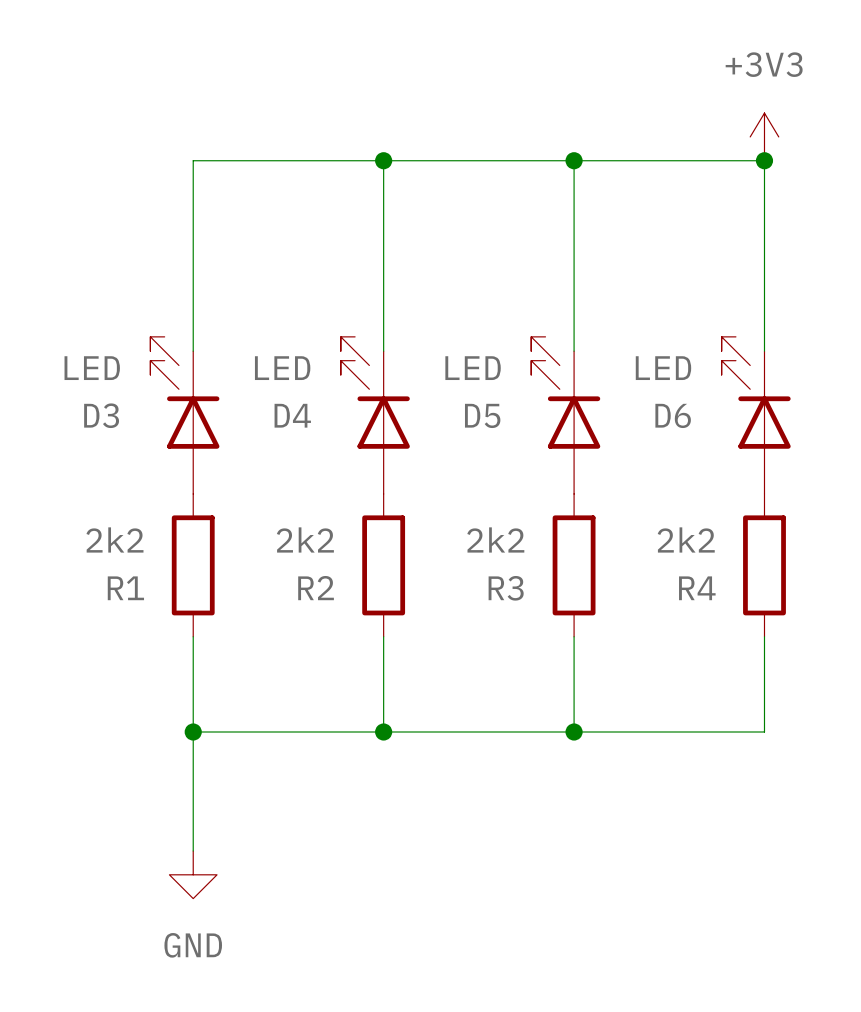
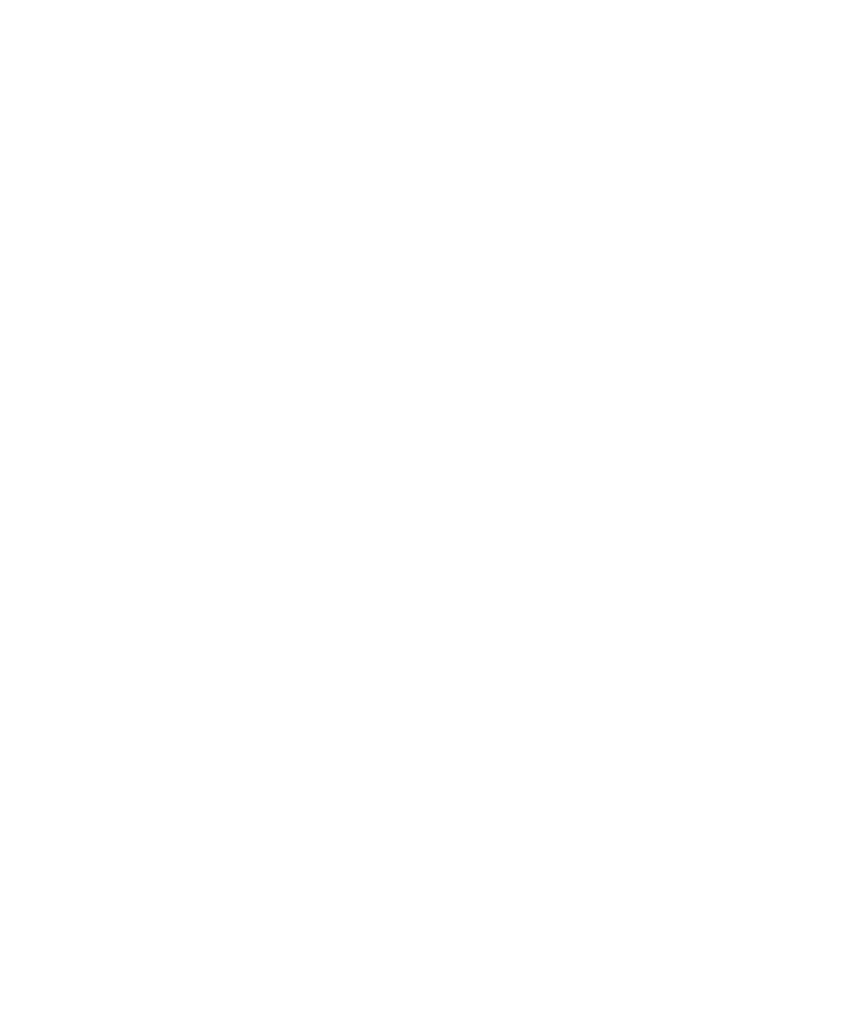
power symbol: +3V3 (764, 136) -> none
wire: (383, 160) (383, 351) -> none
junction: (383, 160) -> none
wire: (574, 160) (574, 351) -> none
junction: (574, 160) -> none
junction: (764, 160) -> none
wire: (193, 351) (193, 160) (764, 160) (764, 351) -> none
D3: LED (184, 415) -> none
D4: LED (375, 415) -> none
D5: LED (565, 415) -> none
D6: LED (756, 415) -> none
R1: 2k2 (193, 565) -> none
R2: 2k2 (383, 565) -> none
R3: 2k2 (574, 565) -> none
R4: 2k2 (764, 565) -> none
wire: (193, 636) (193, 851) -> none
wire: (383, 636) (383, 732) -> none
wire: (574, 636) (574, 732) -> none
wire: (764, 636) (764, 732) (193, 732) -> none
junction: (193, 732) -> none
junction: (383, 732) -> none
junction: (574, 732) -> none
power symbol: GND (193, 874) -> none

